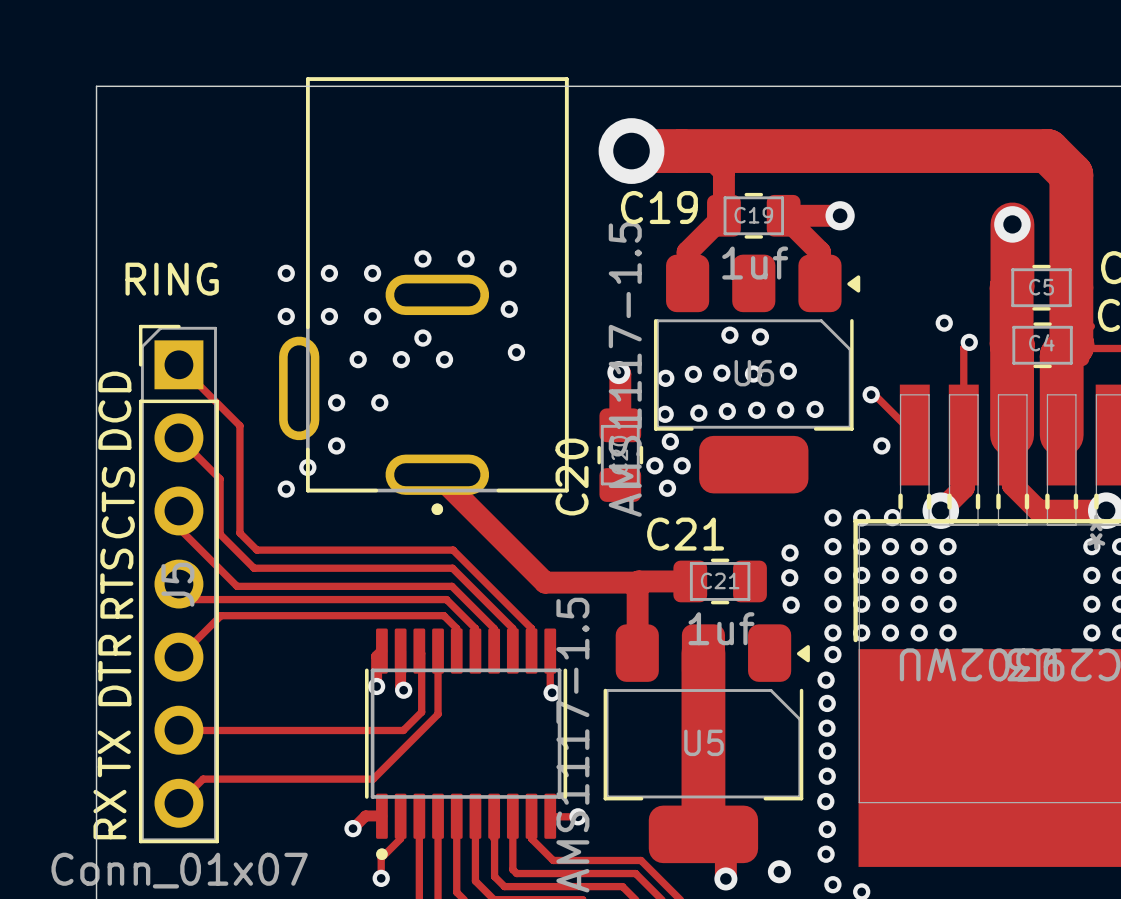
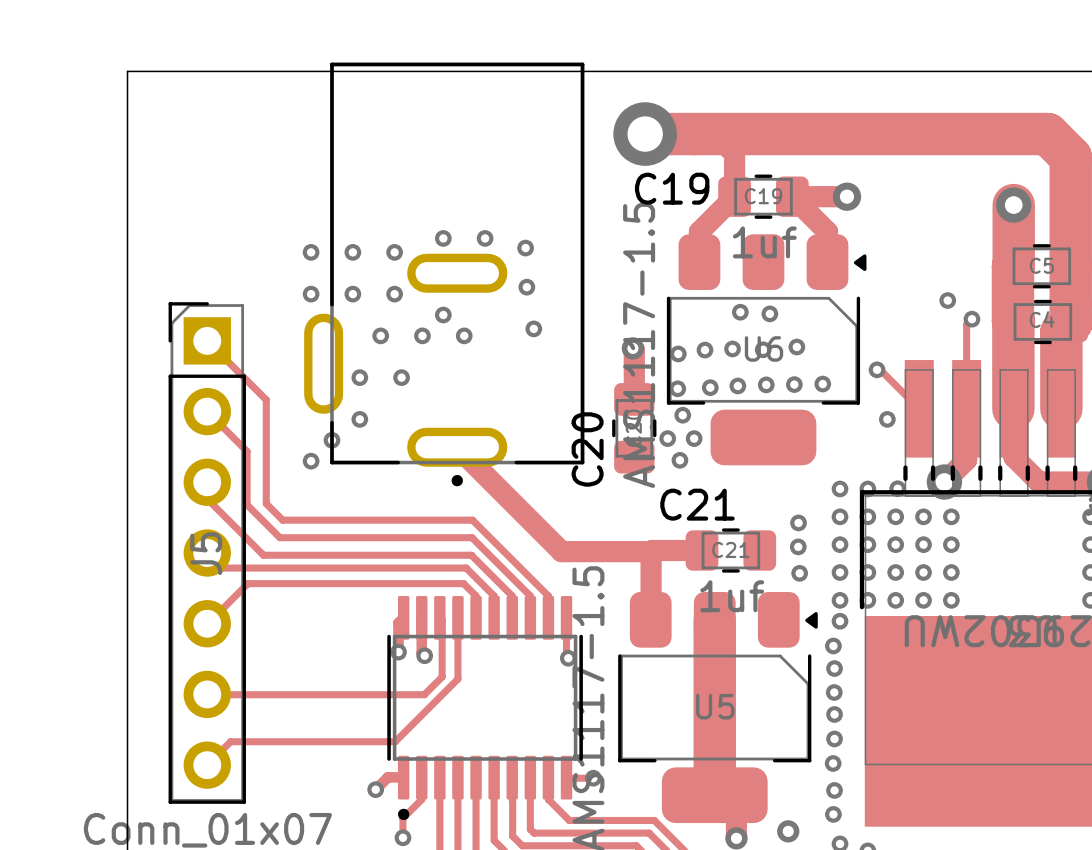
text: RING (172, 279) -> none
text: DCD (114, 410) -> none
text: CTS (118, 502) -> none
text: RTS (116, 583) -> none
text: DTR (114, 670) -> none
text: TX (114, 753) -> none
text: RX (109, 814) -> none

